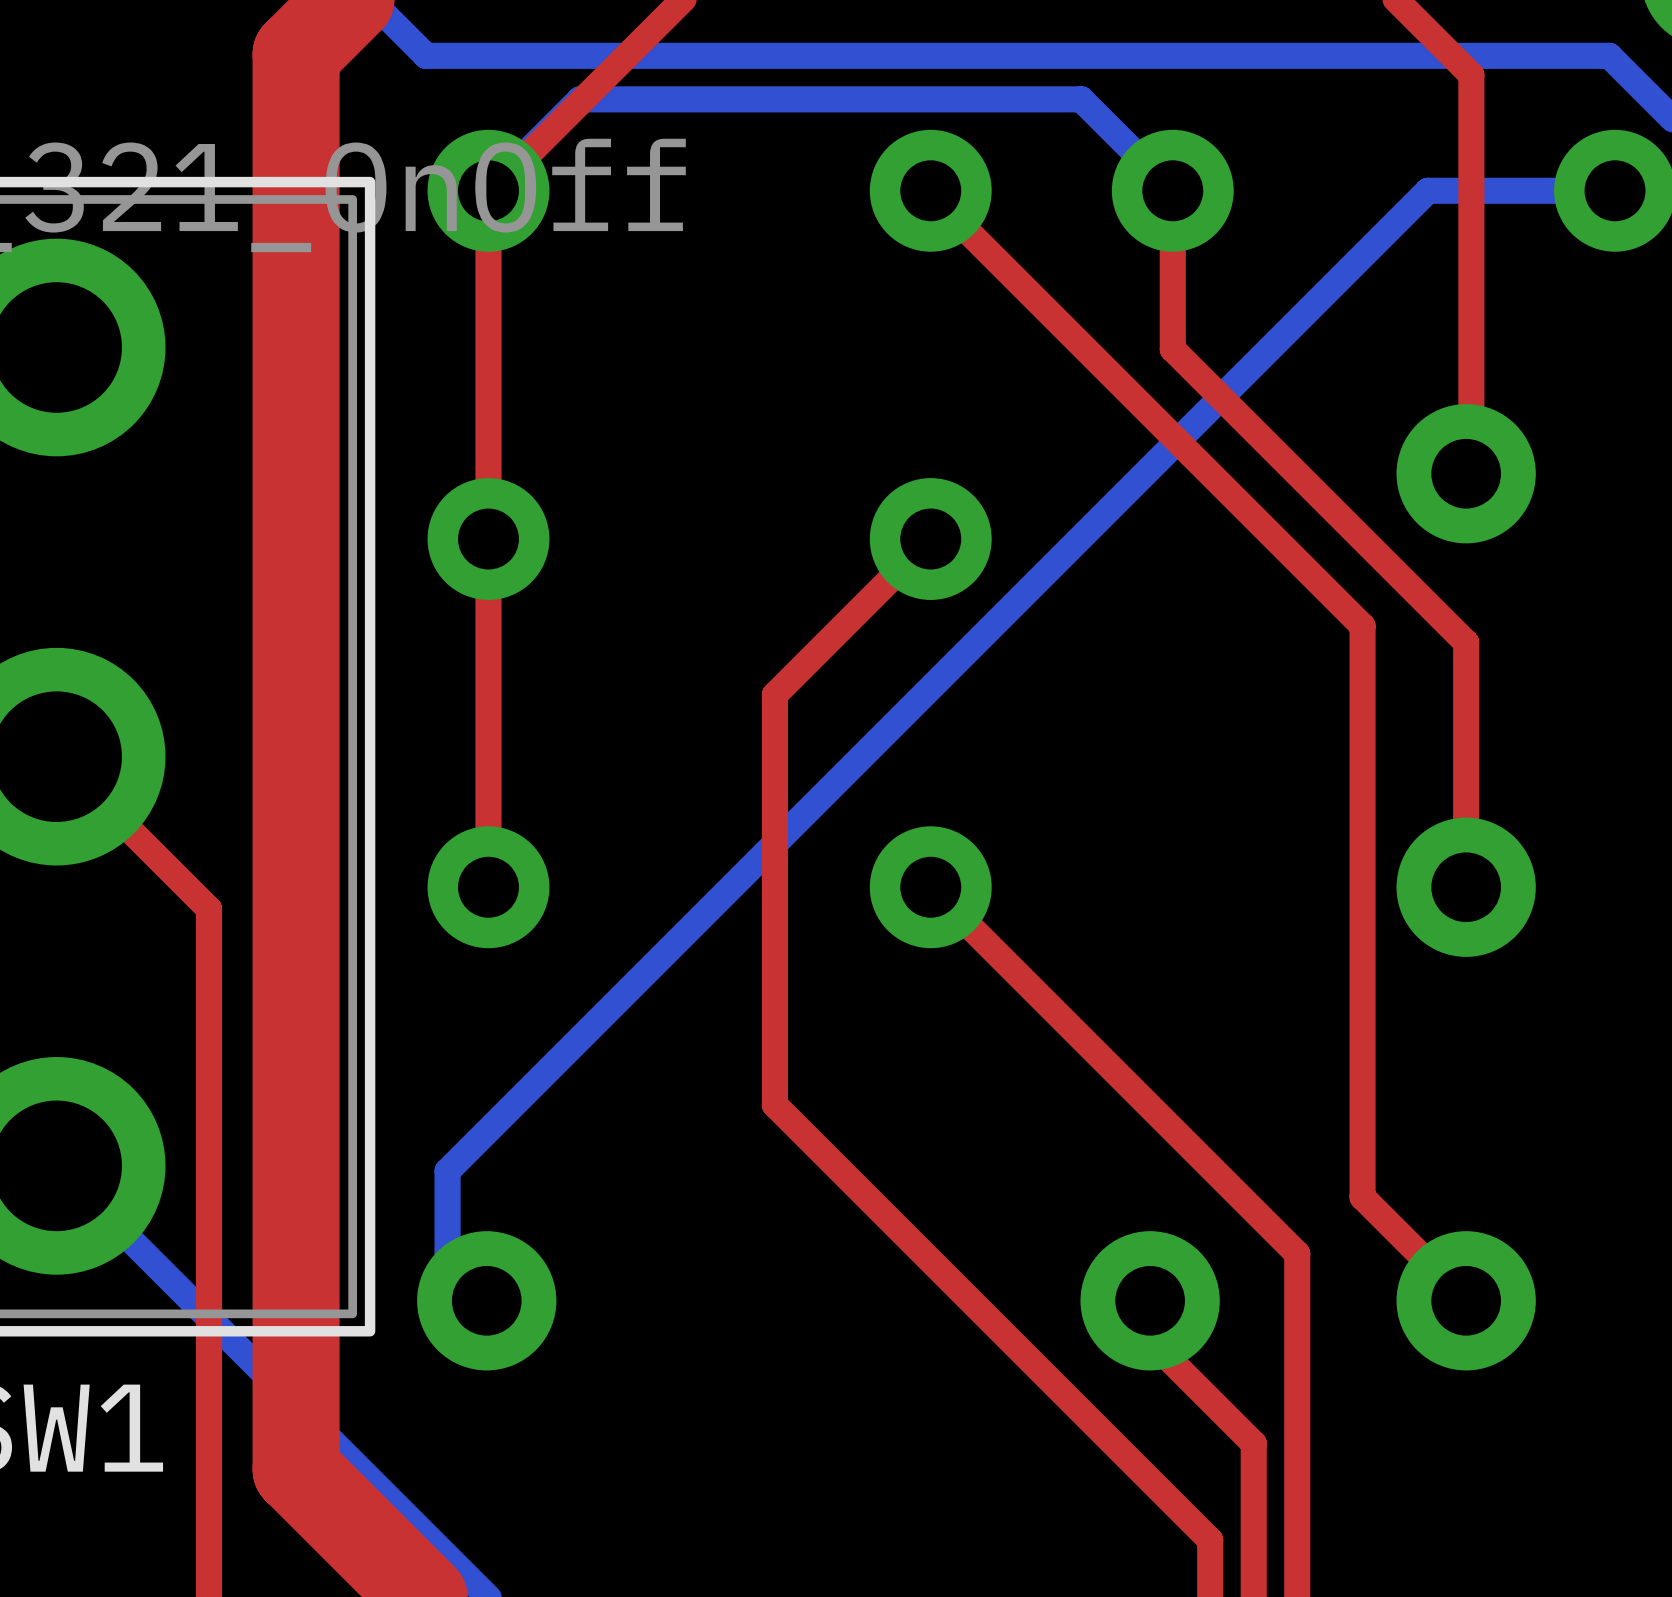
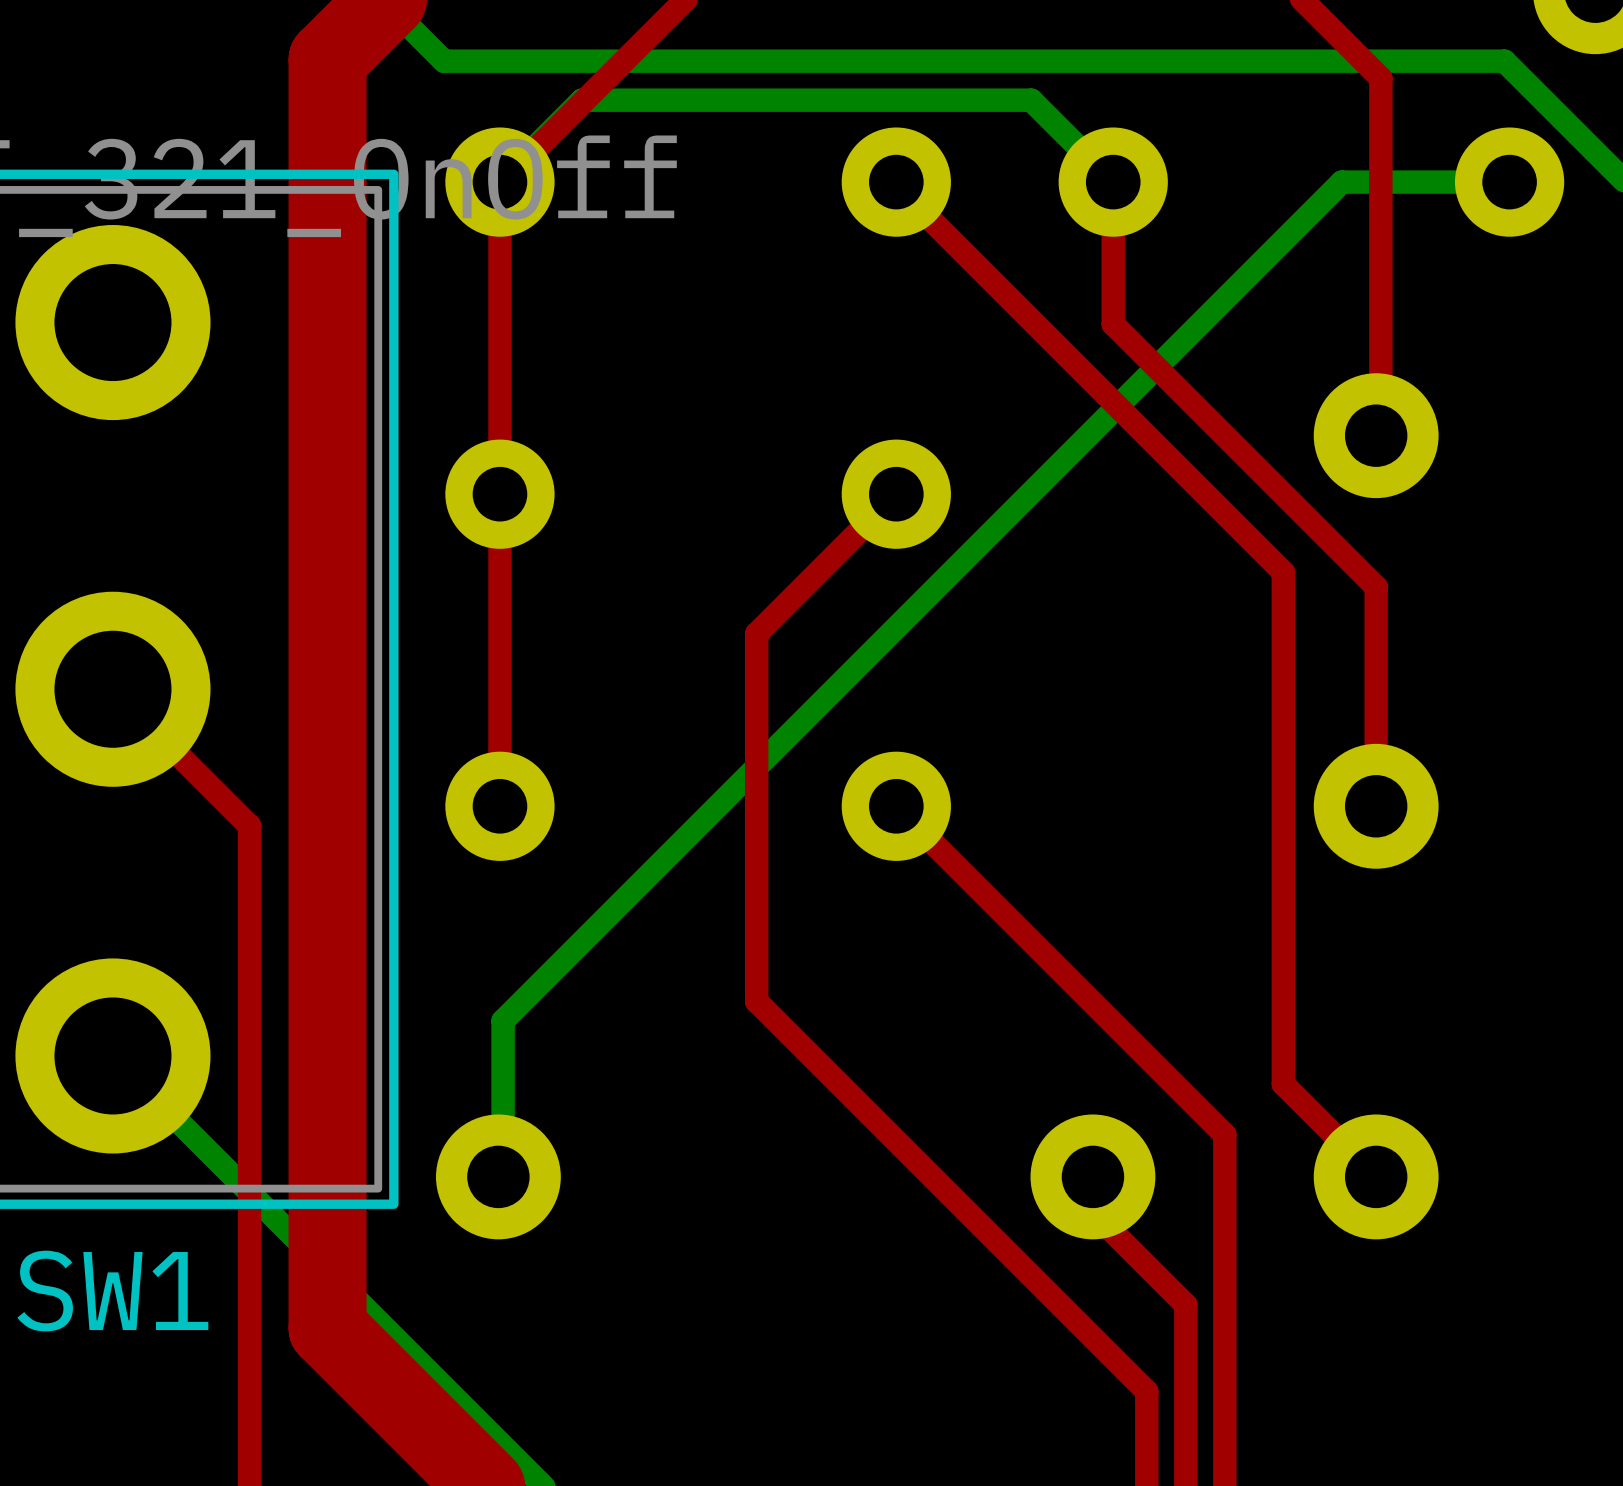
bottom track: (491, 1126) (447, 1171) (447, 1300) -> (503, 1020) (503, 1172) (498, 1176) (463, 1176)

